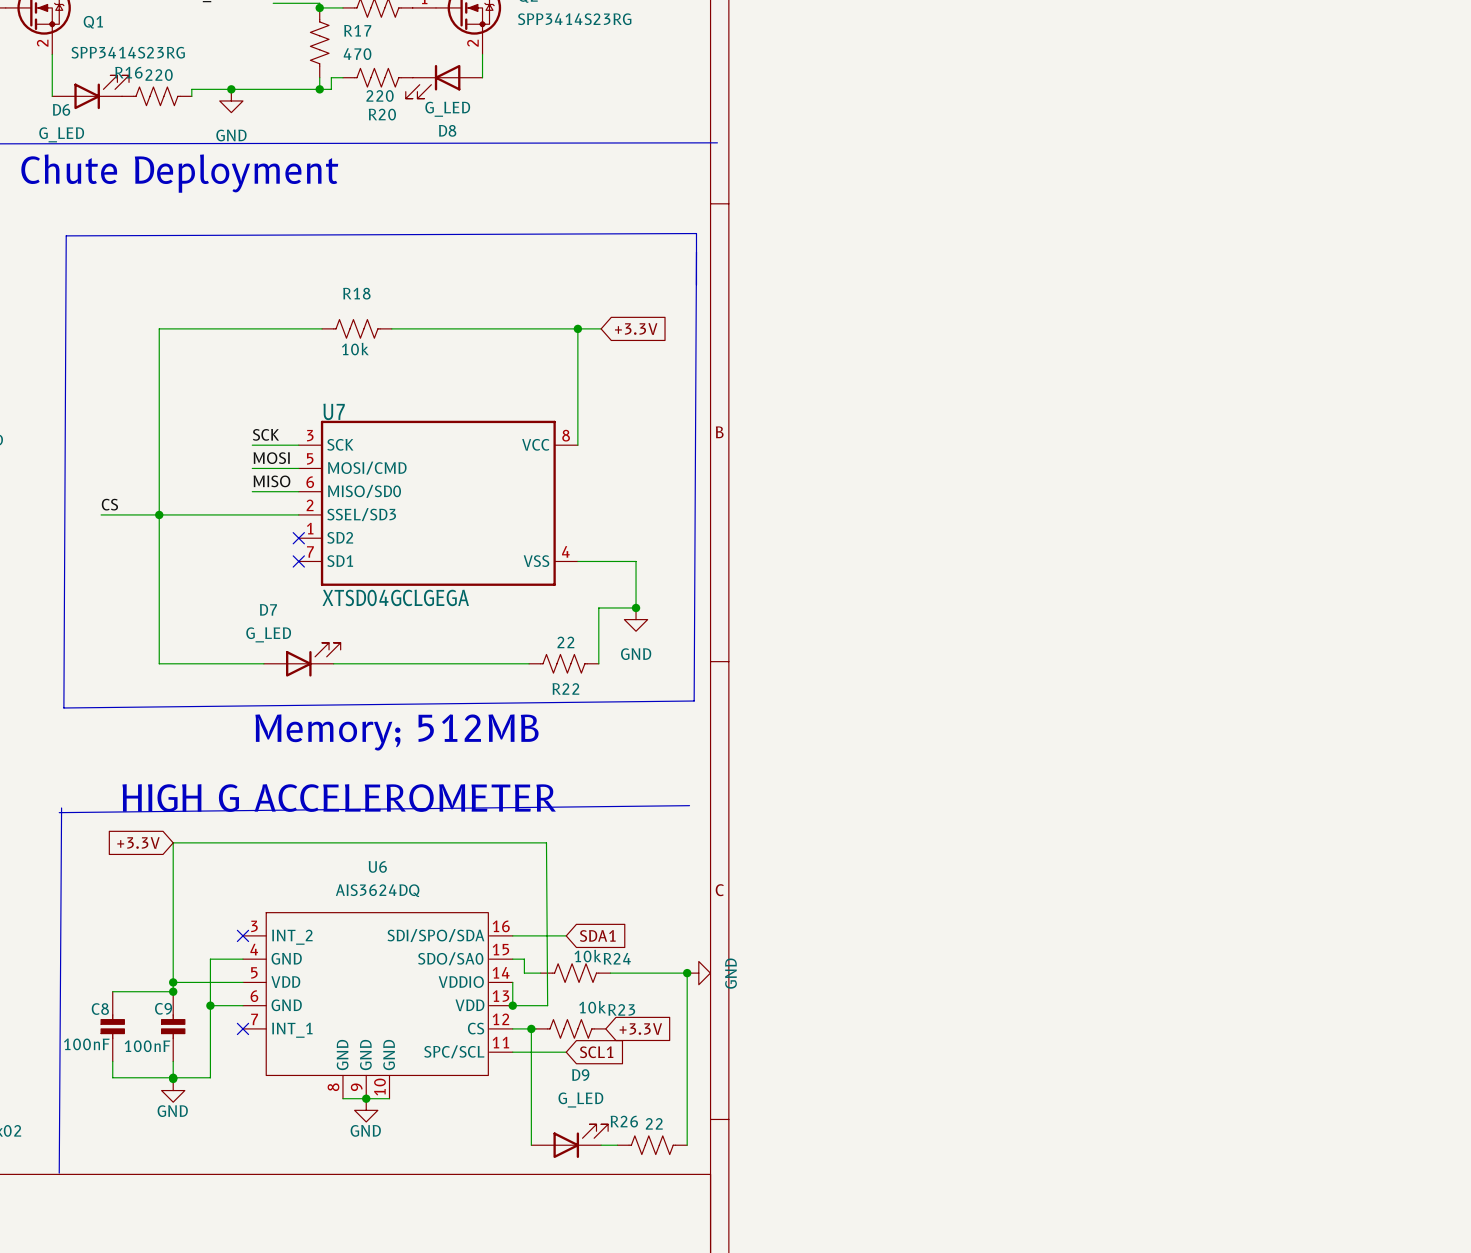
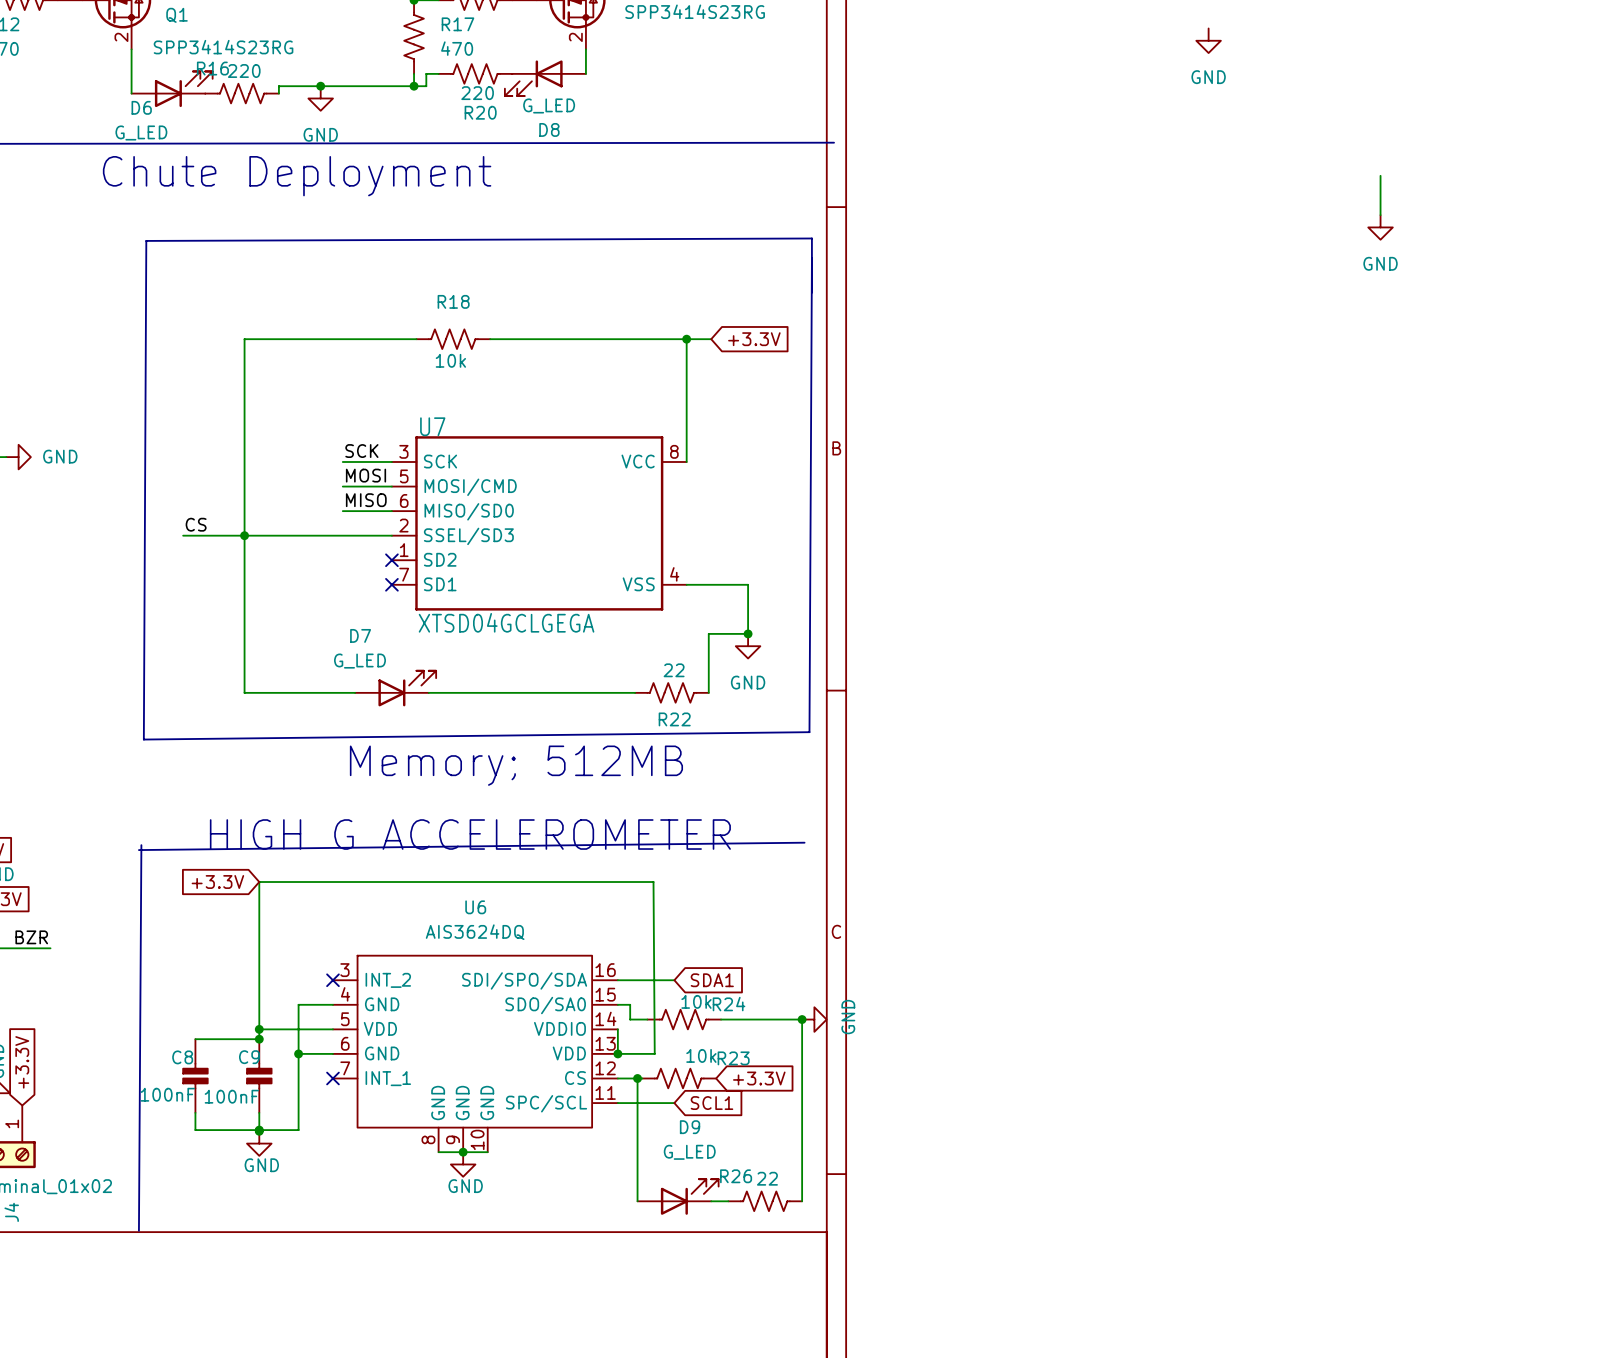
power symbol: none -> GND (1208, 40)
wire: none -> (1380, 175) (1380, 215)
power symbol: none -> GND (1380, 227)

